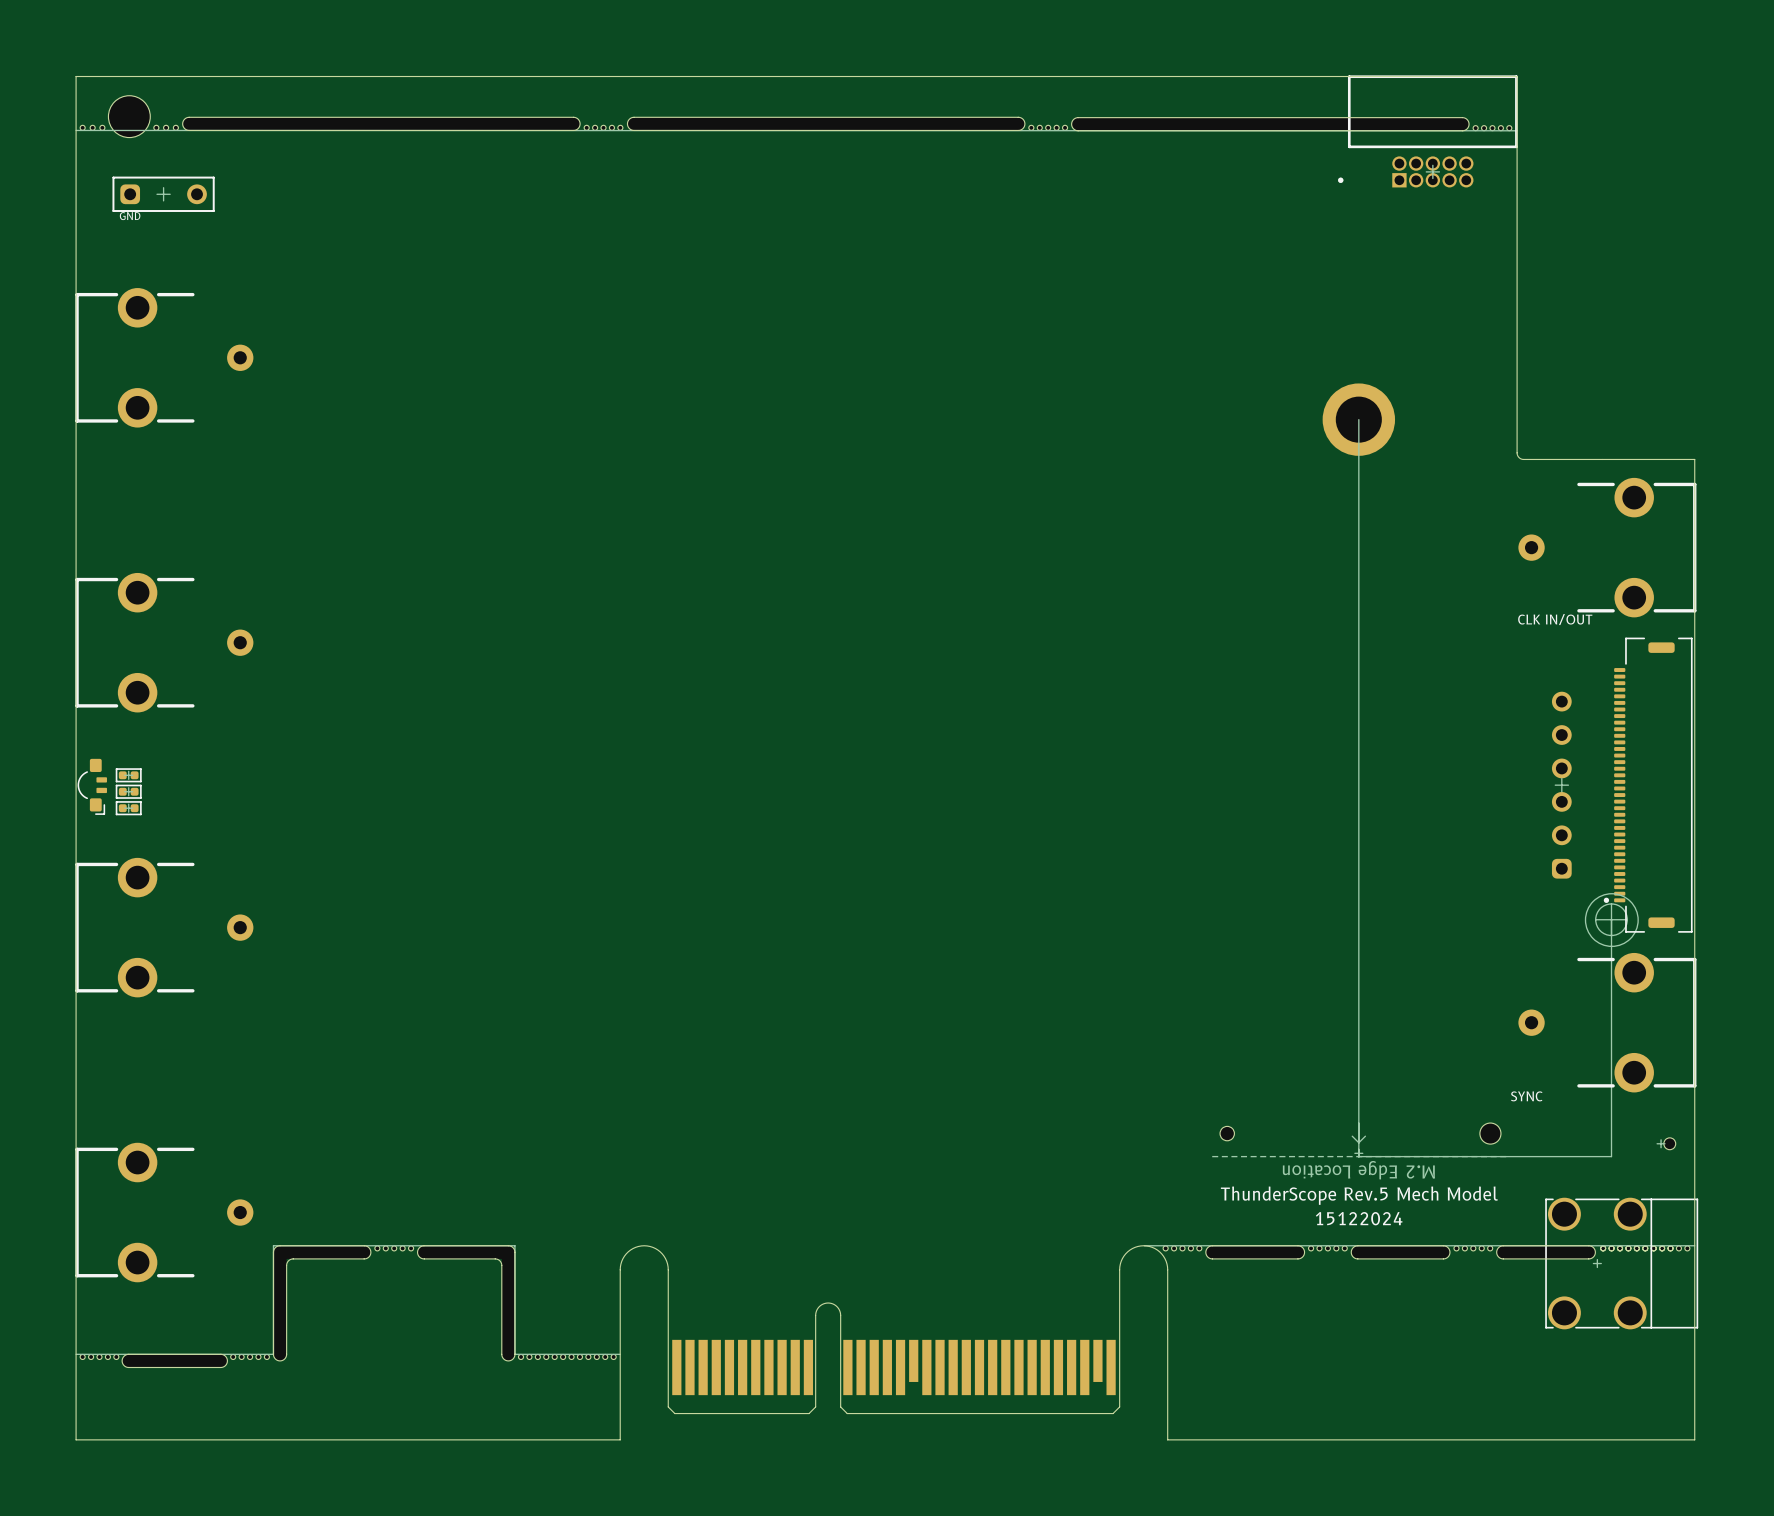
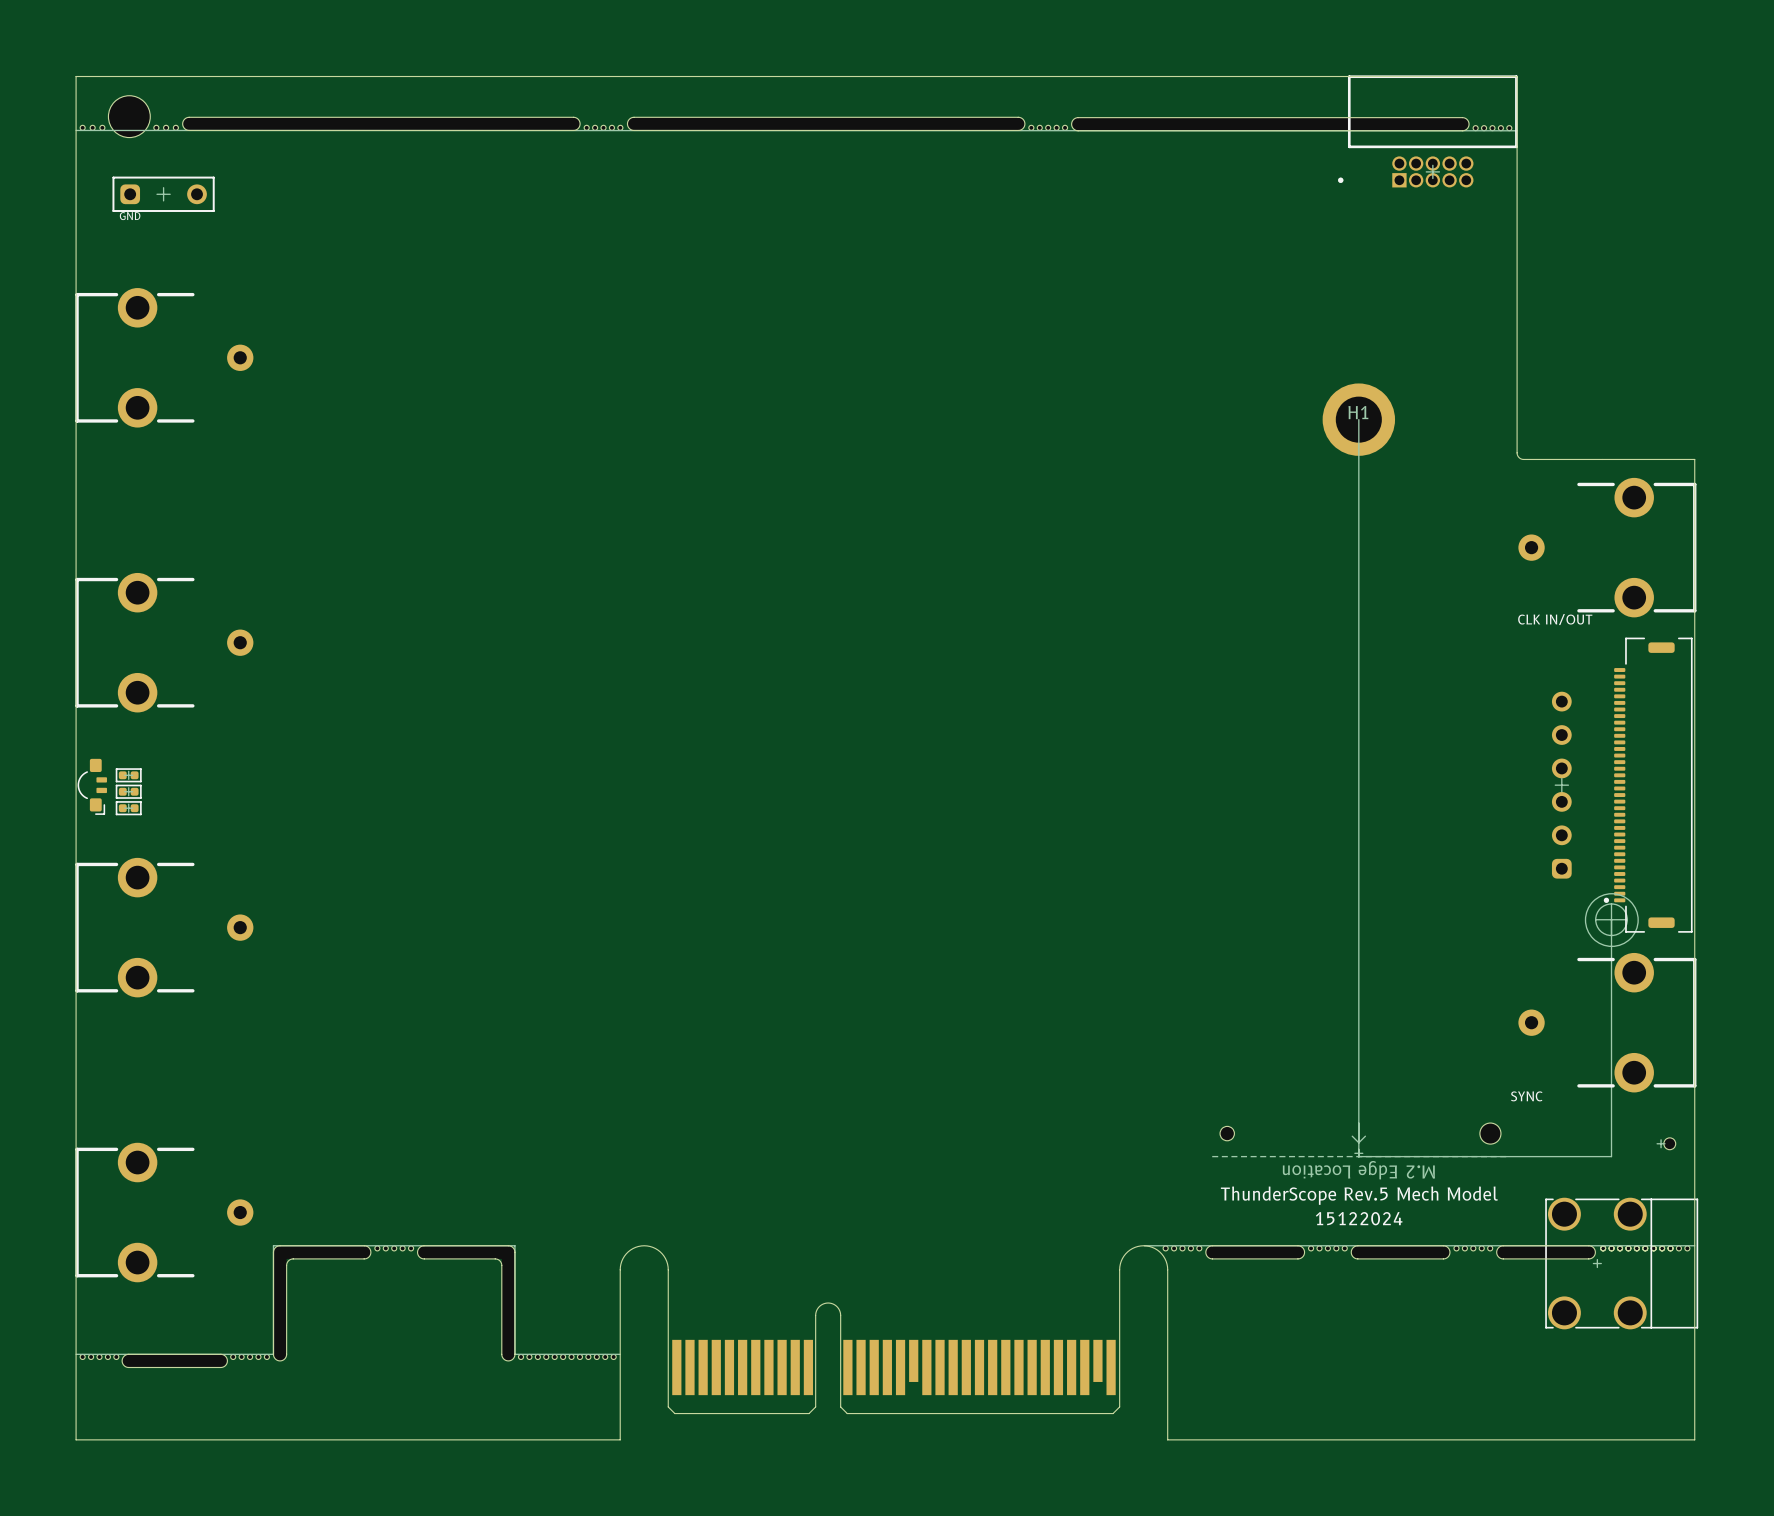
H1 name: none -> H1 (1358, 412)

